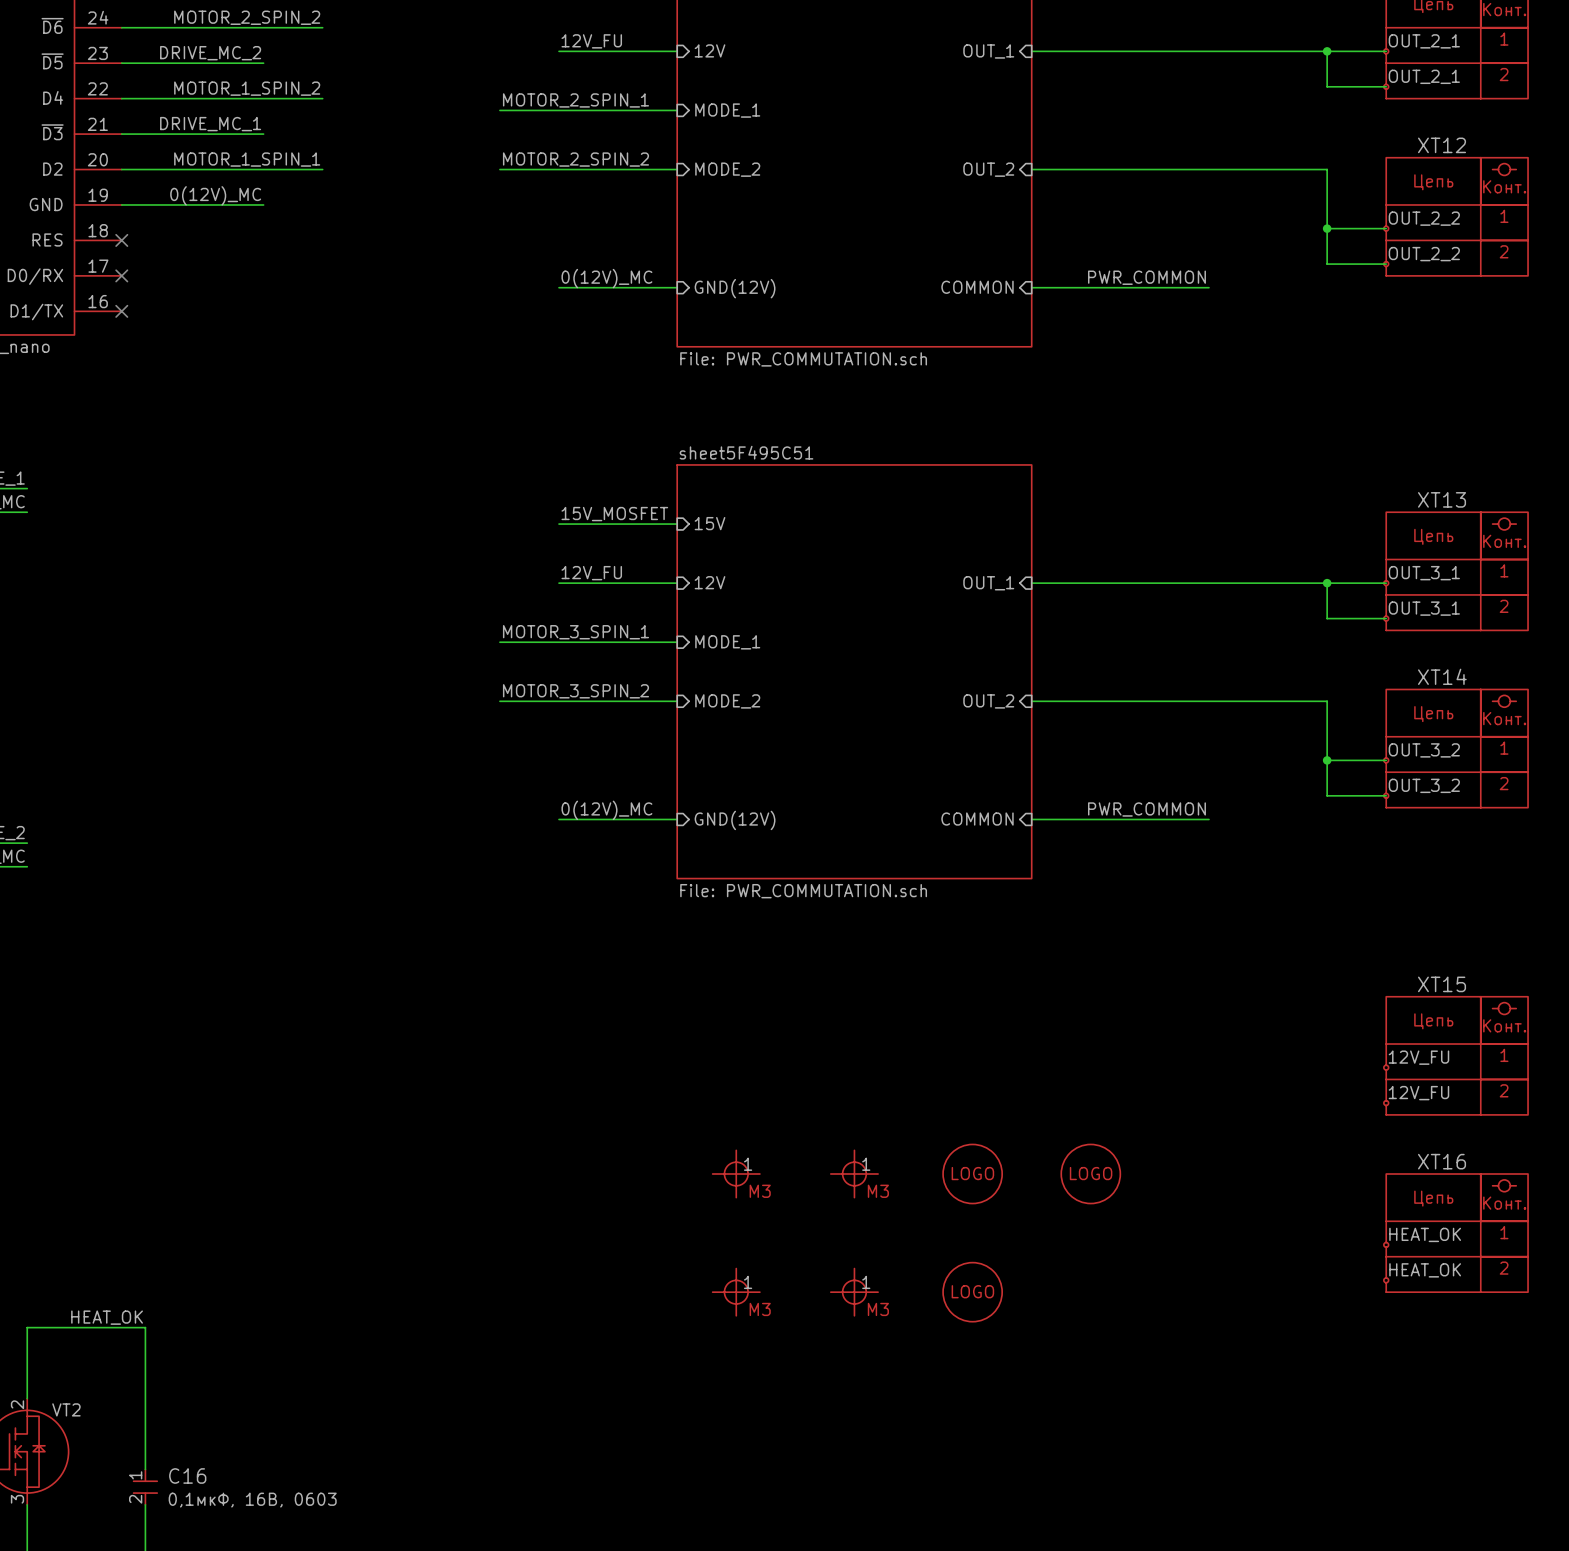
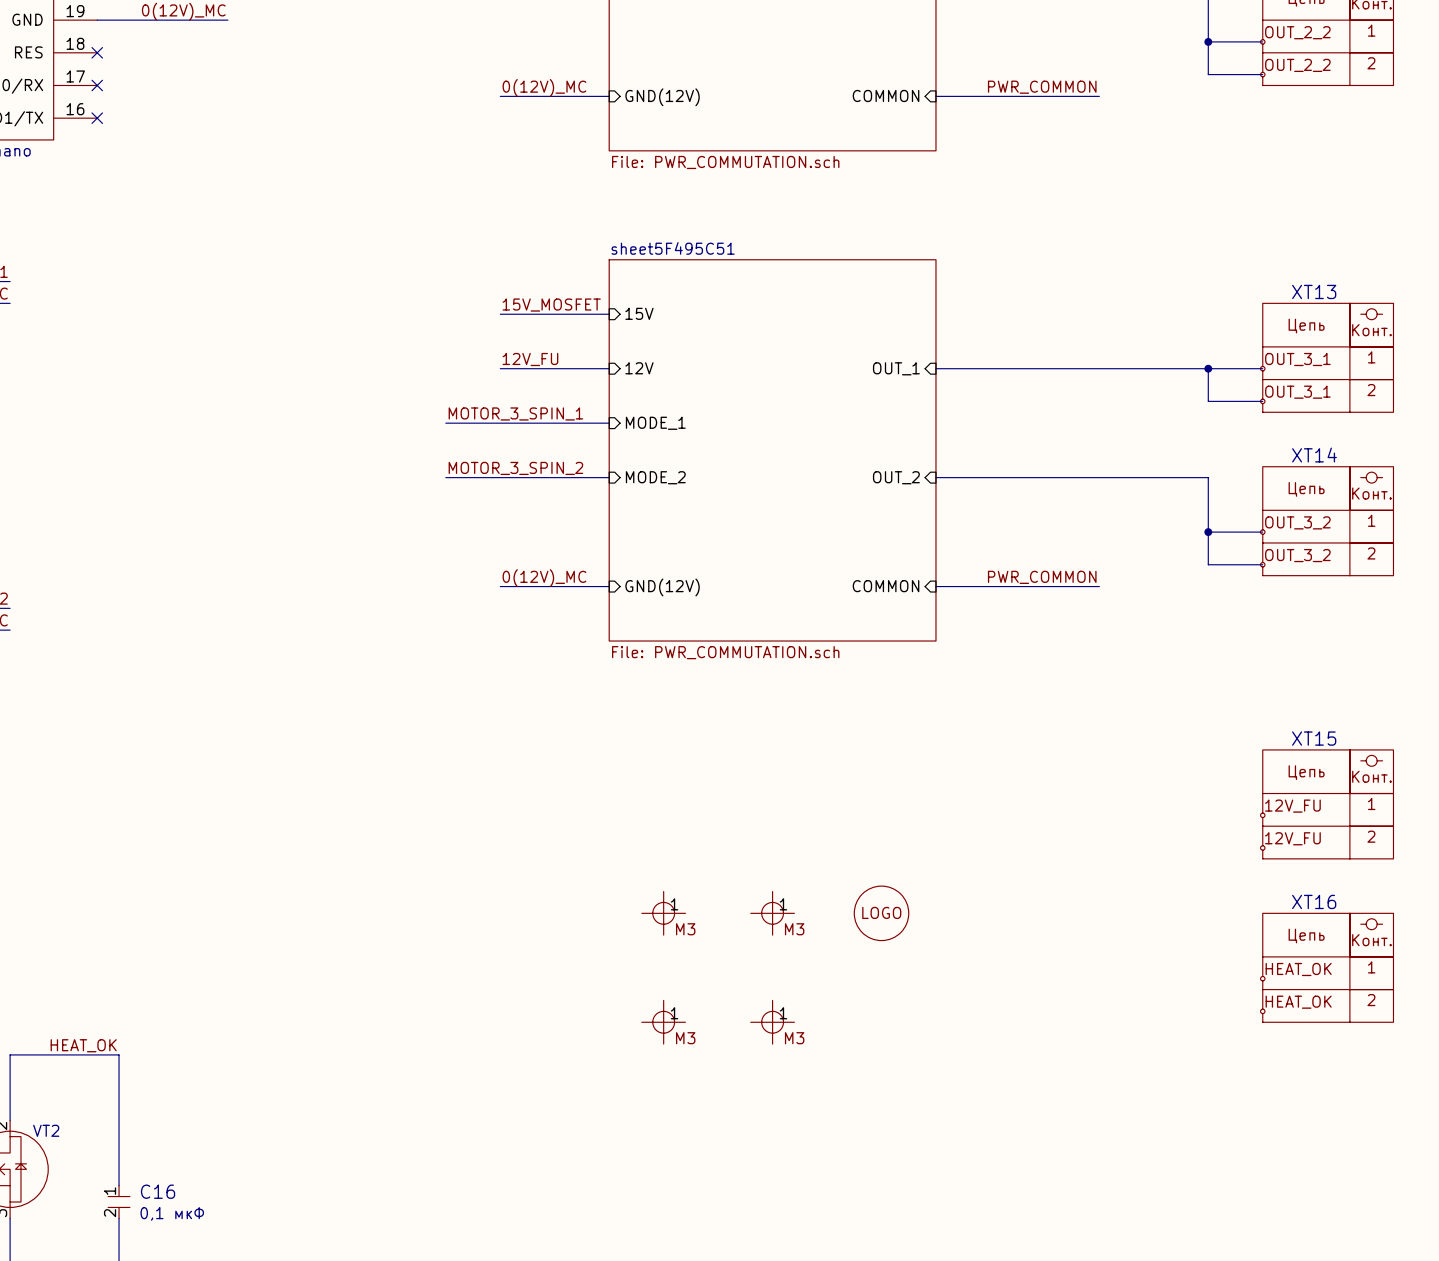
part: (1090, 1174) -> none
part: (972, 1292) -> none
C16 text: 0,1мкФ, 16В, 0603 (252, 1500) -> 0,1 мкФ (172, 1213)

